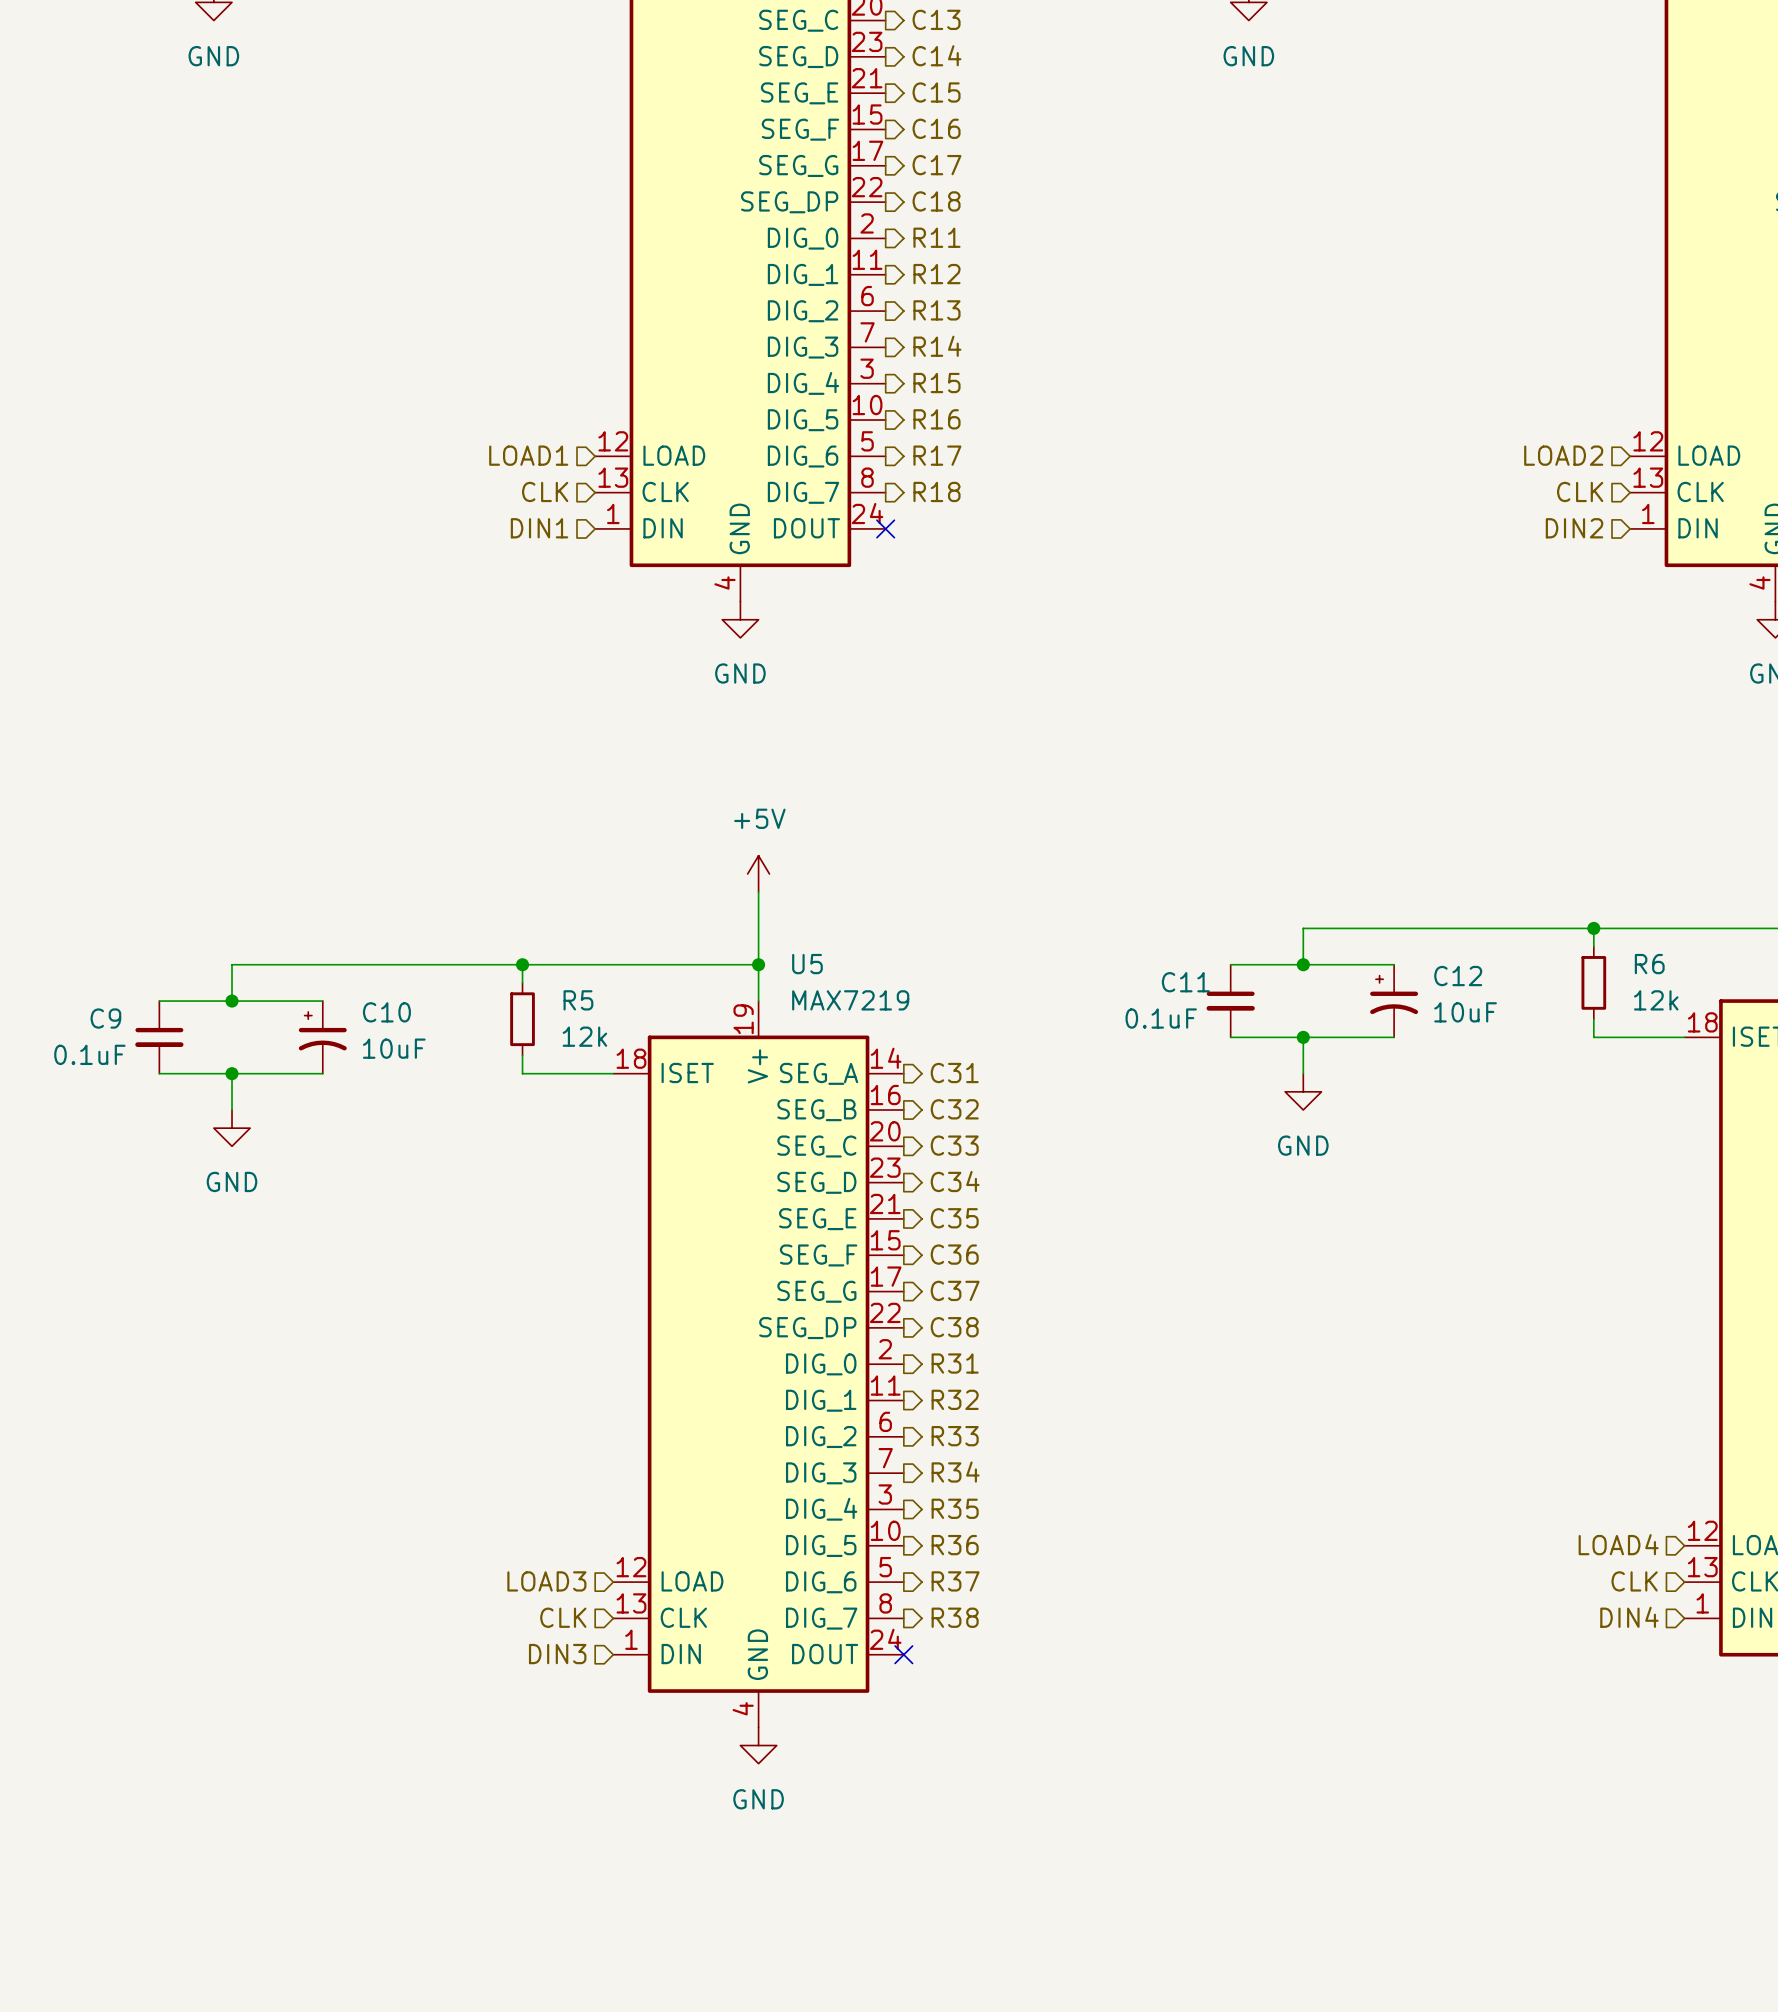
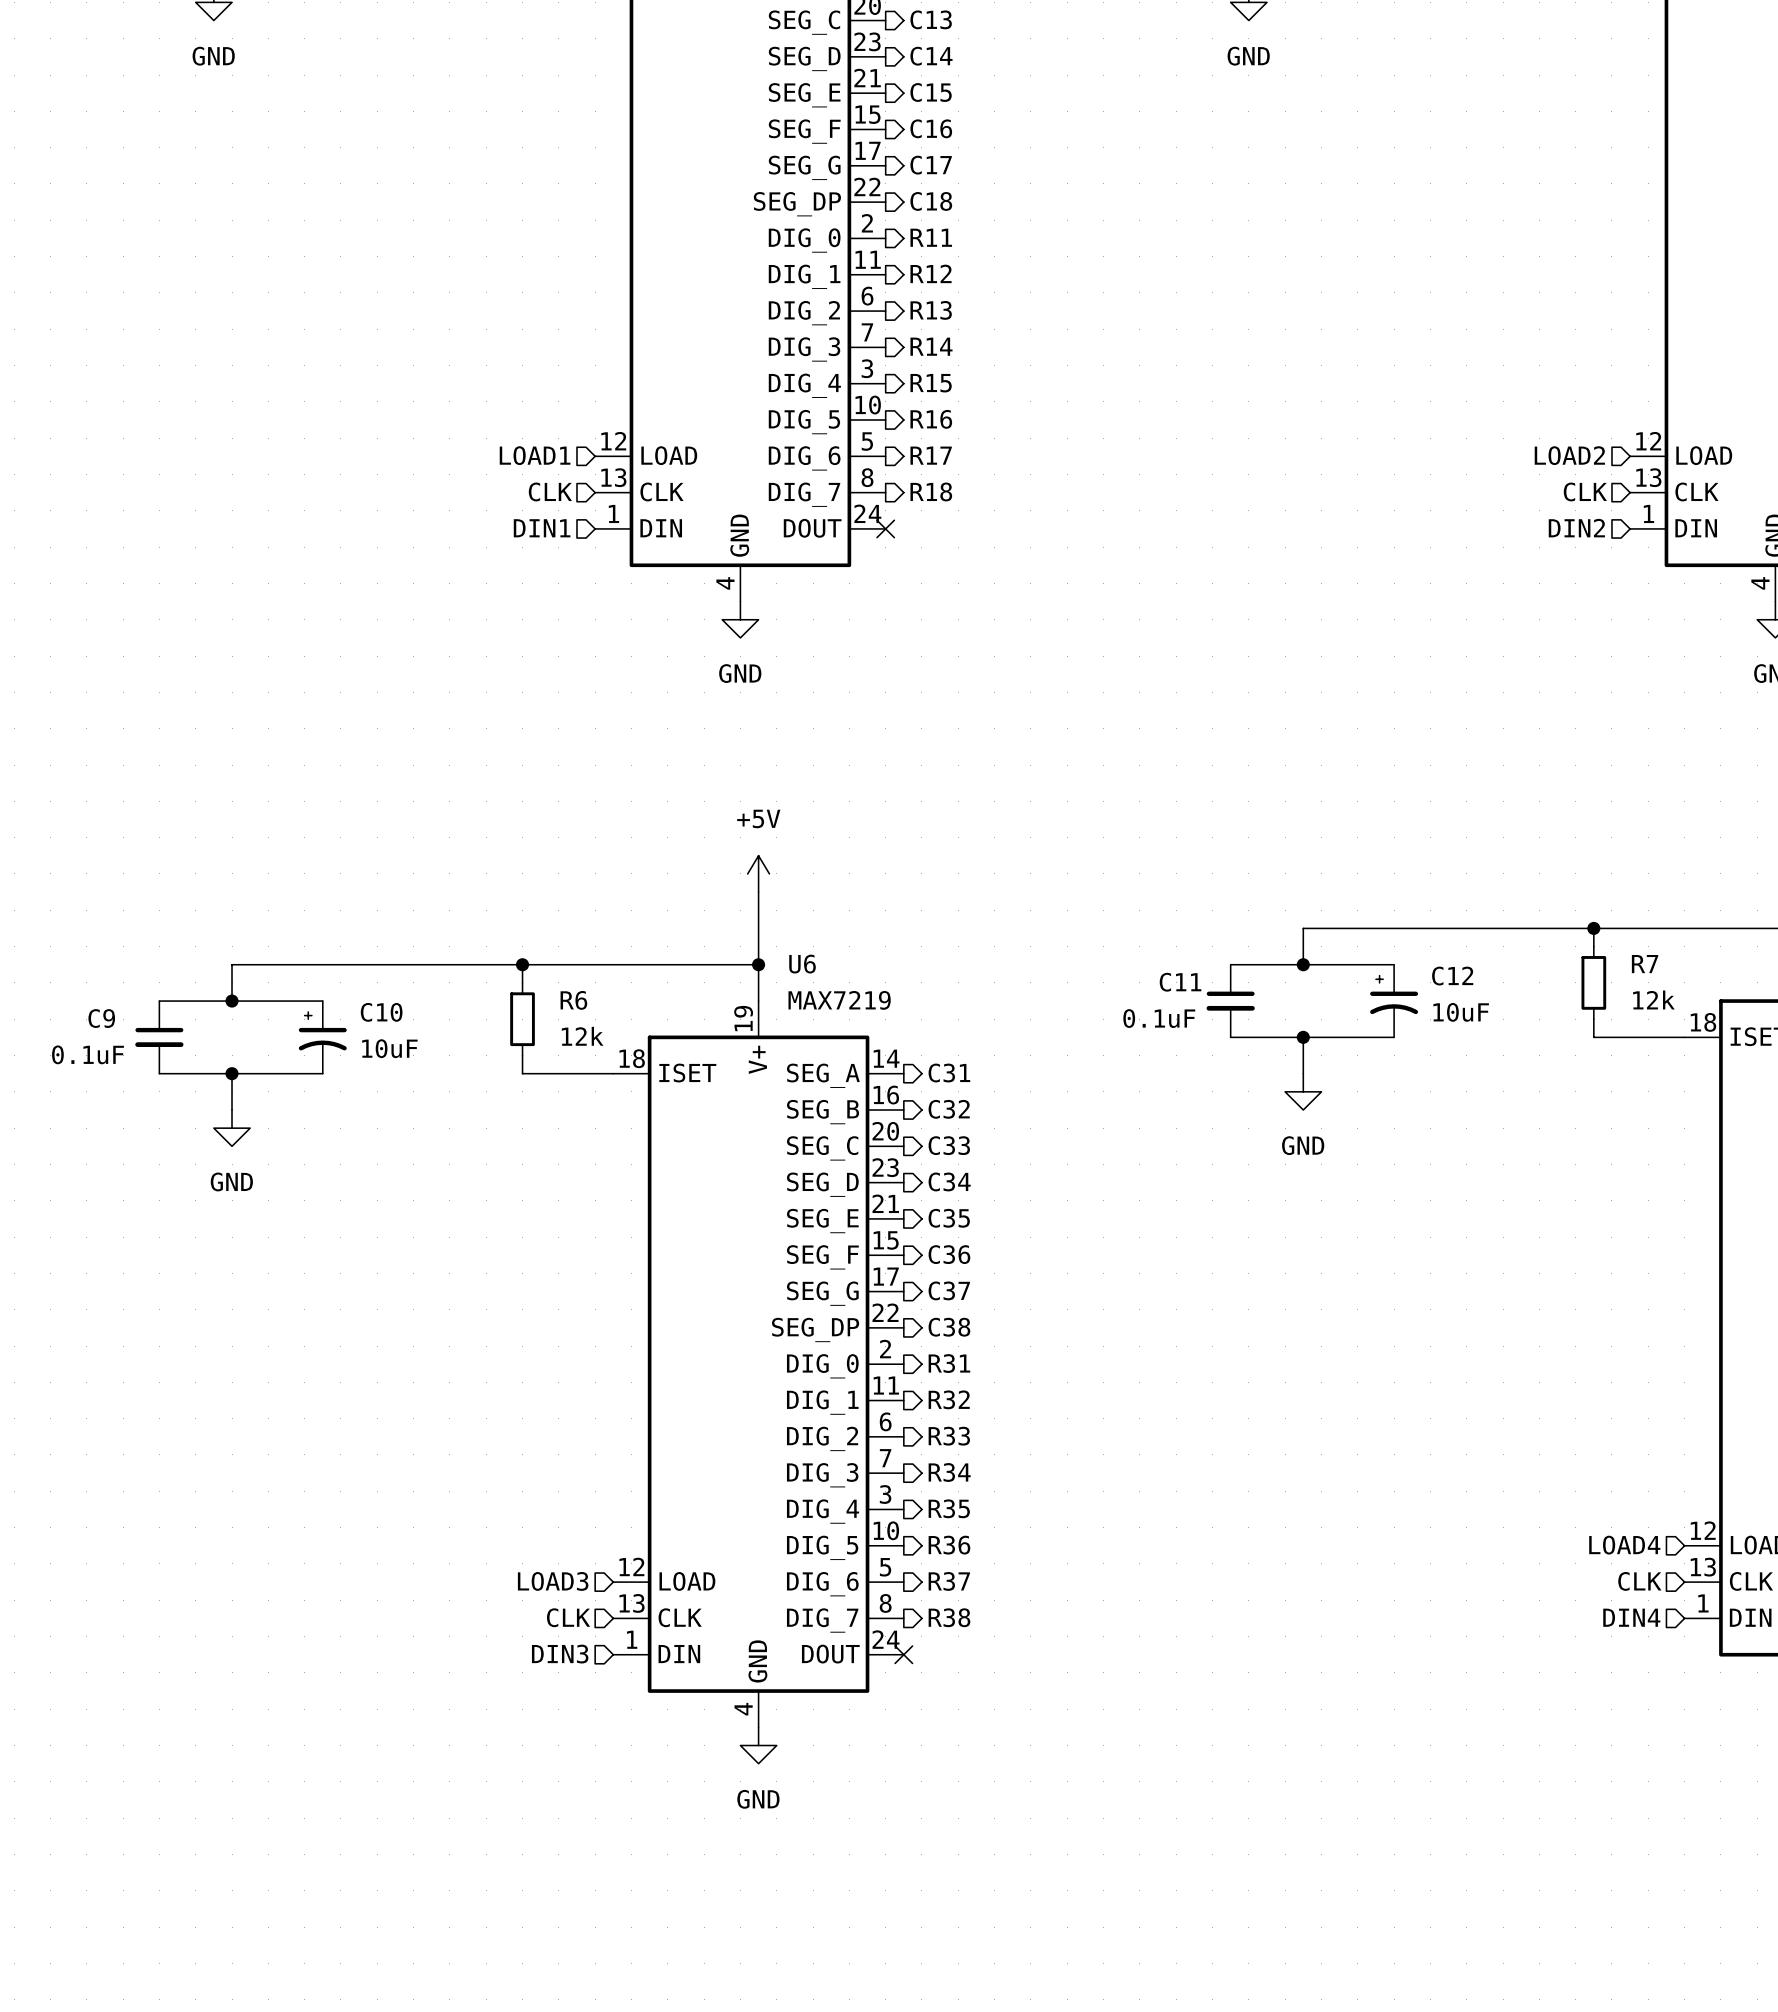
U5 name: U5 (807, 964) -> U6 (802, 964)
R6 name: R6 (1649, 964) -> R7 (1645, 964)
R5 name: R5 (578, 1000) -> R6 (573, 1000)

